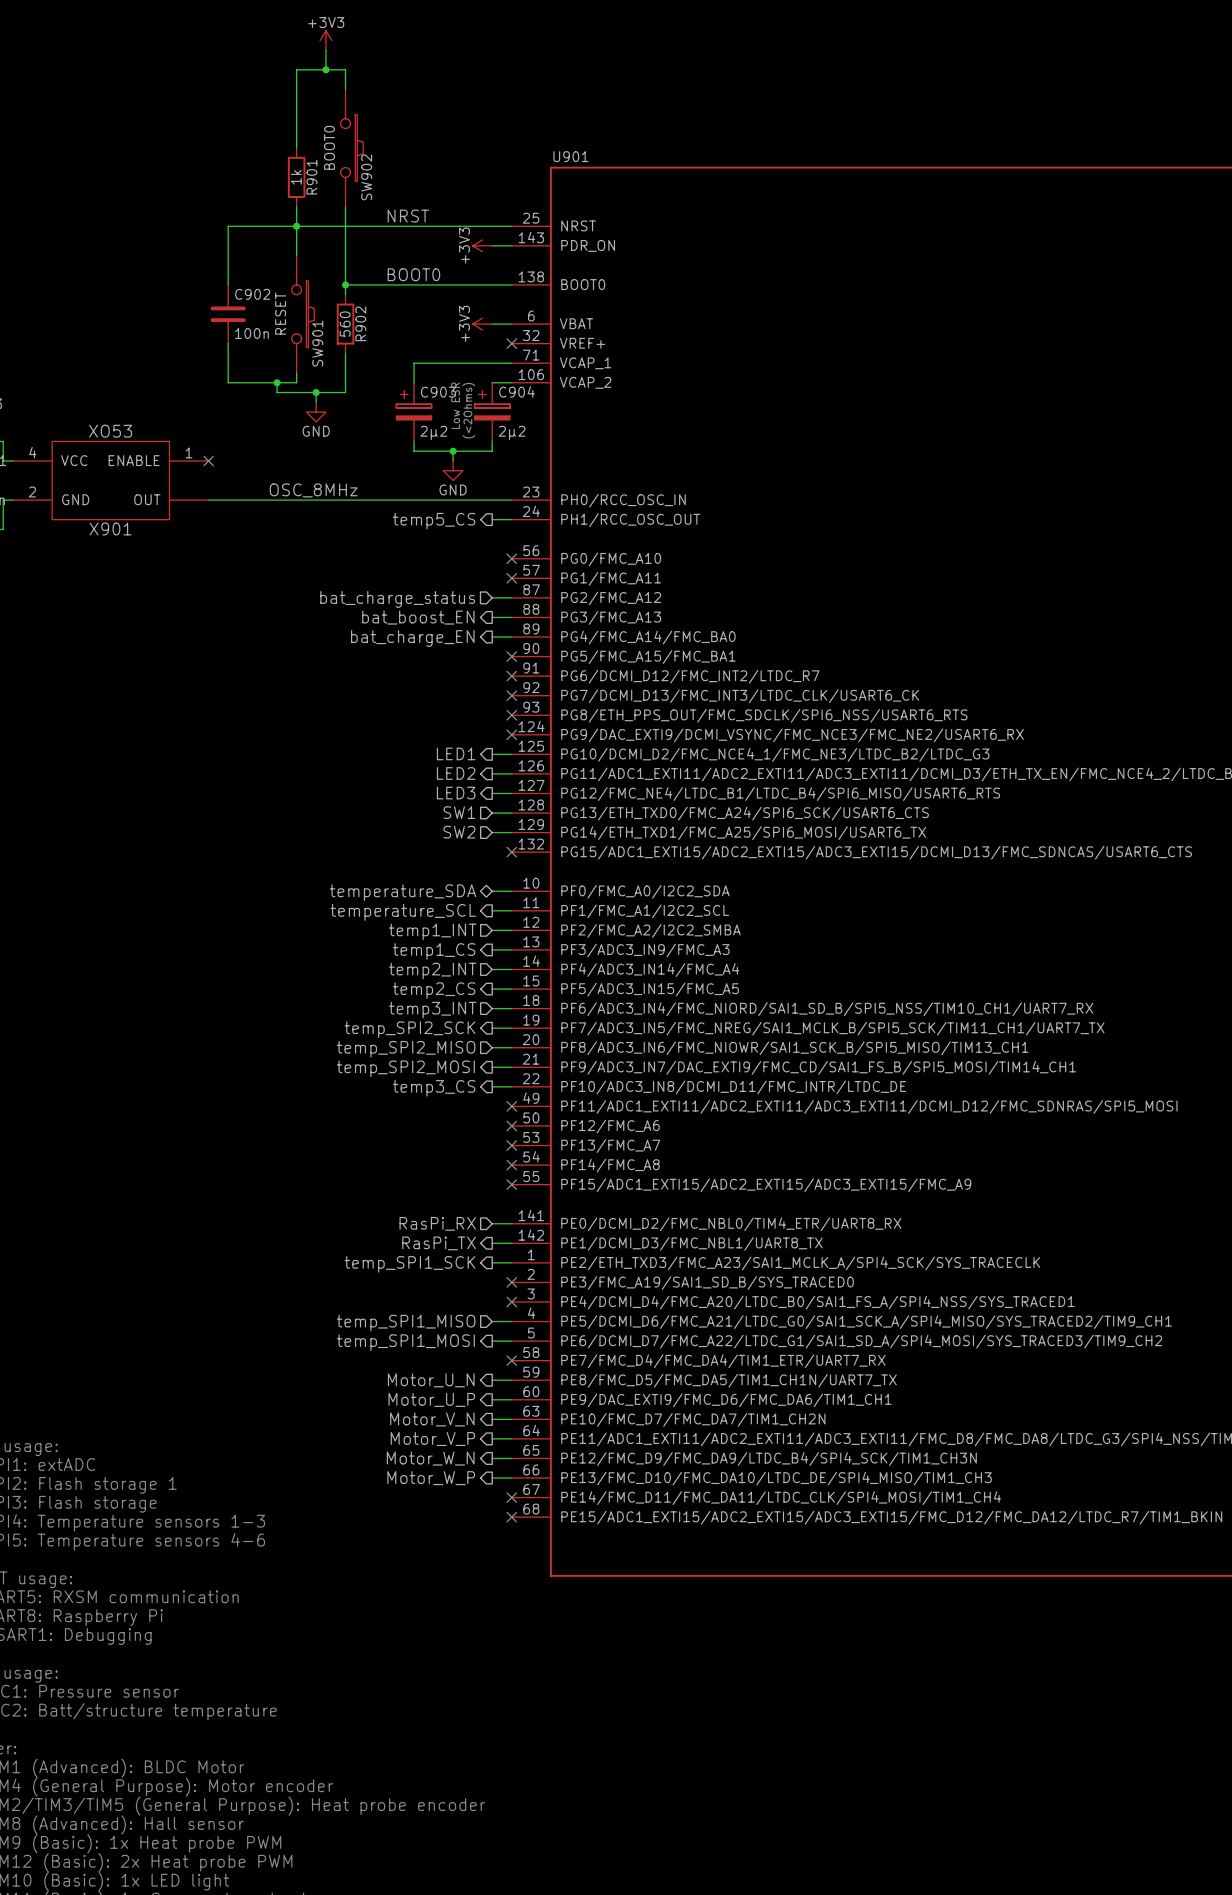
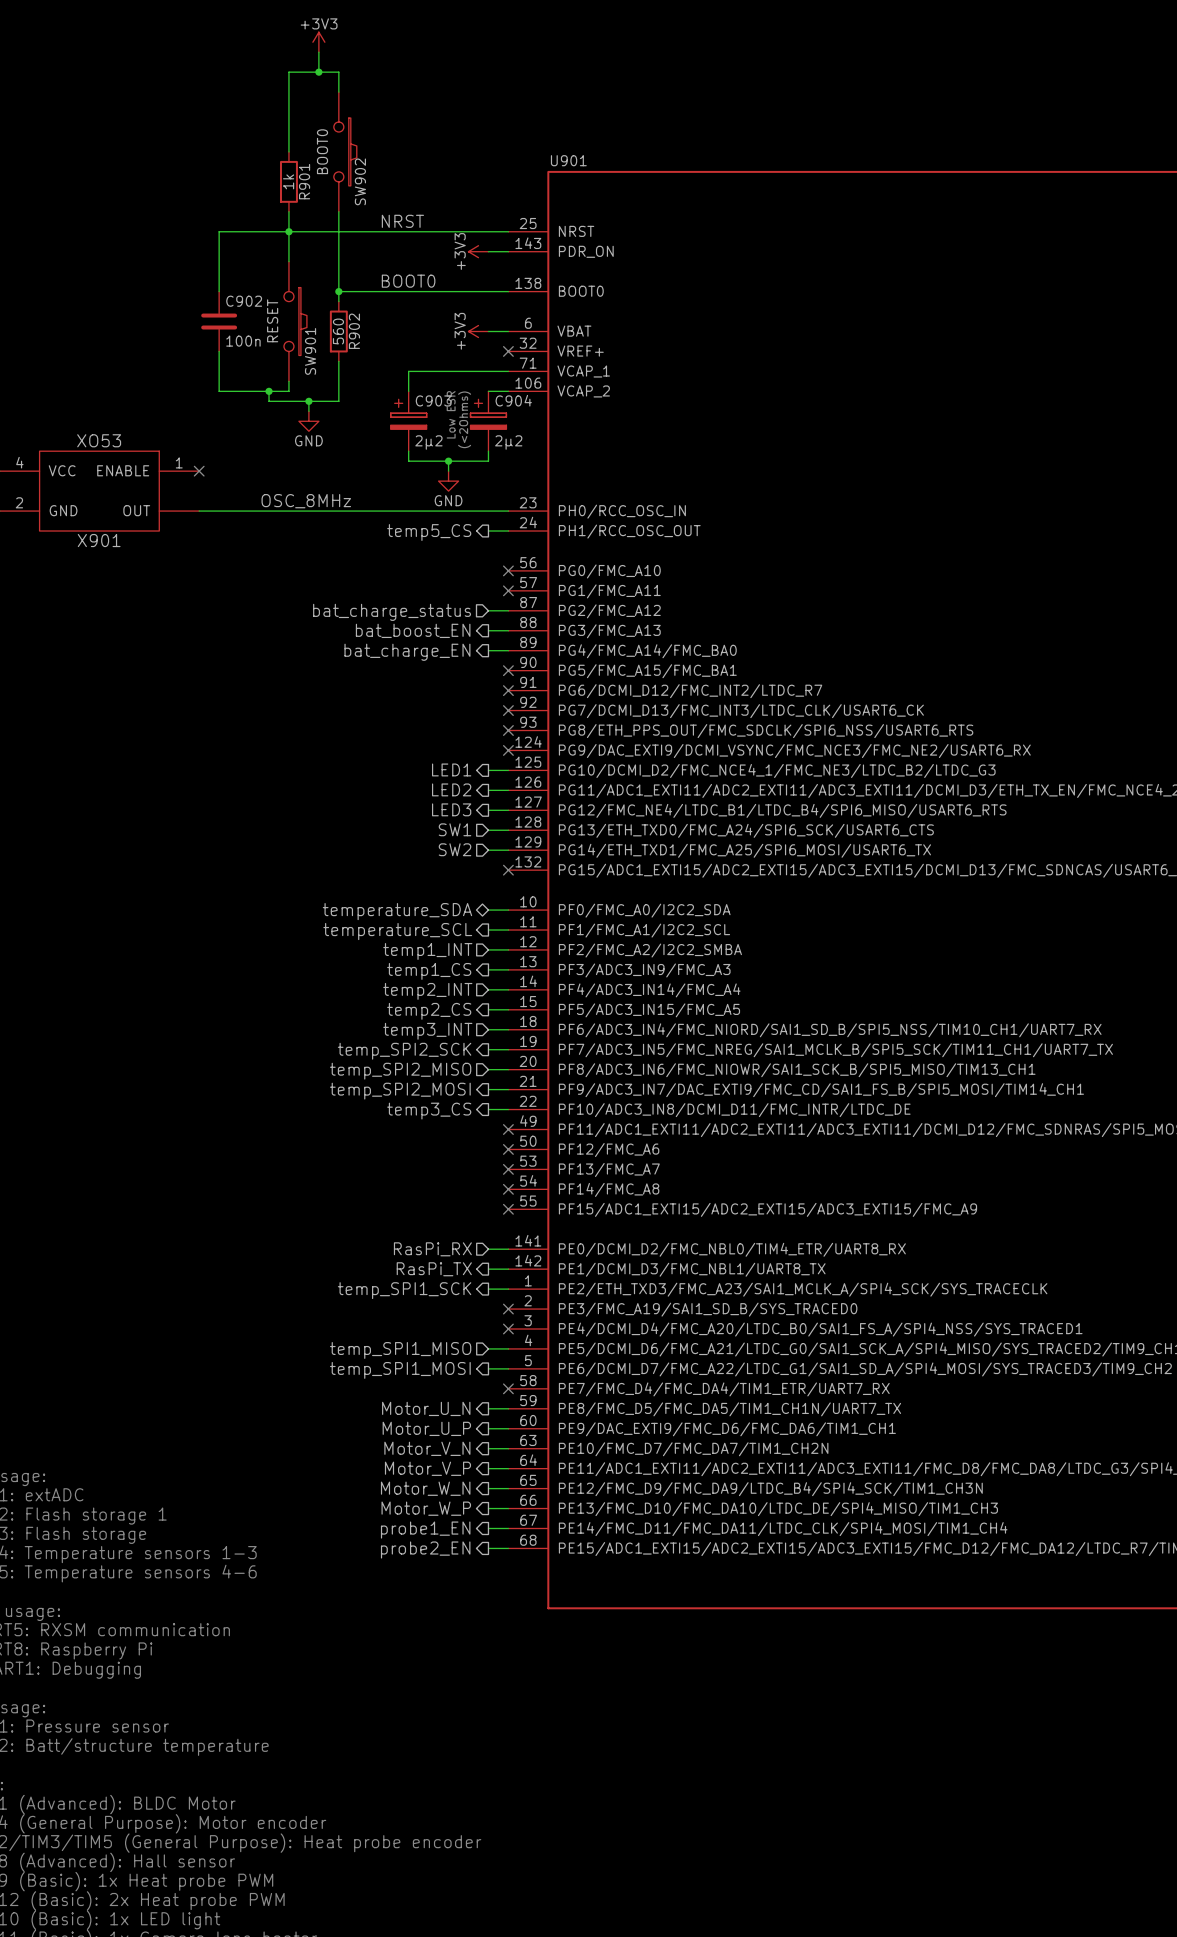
wire: none -> (488, 1528) (508, 1528)
no-connect mark: (511, 1497) -> none
hierarchical label: none -> probe1_EN (425, 1530)
wire: none -> (488, 1548) (508, 1548)
no-connect mark: (511, 1517) -> none
hierarchical label: none -> probe2_EN (425, 1550)

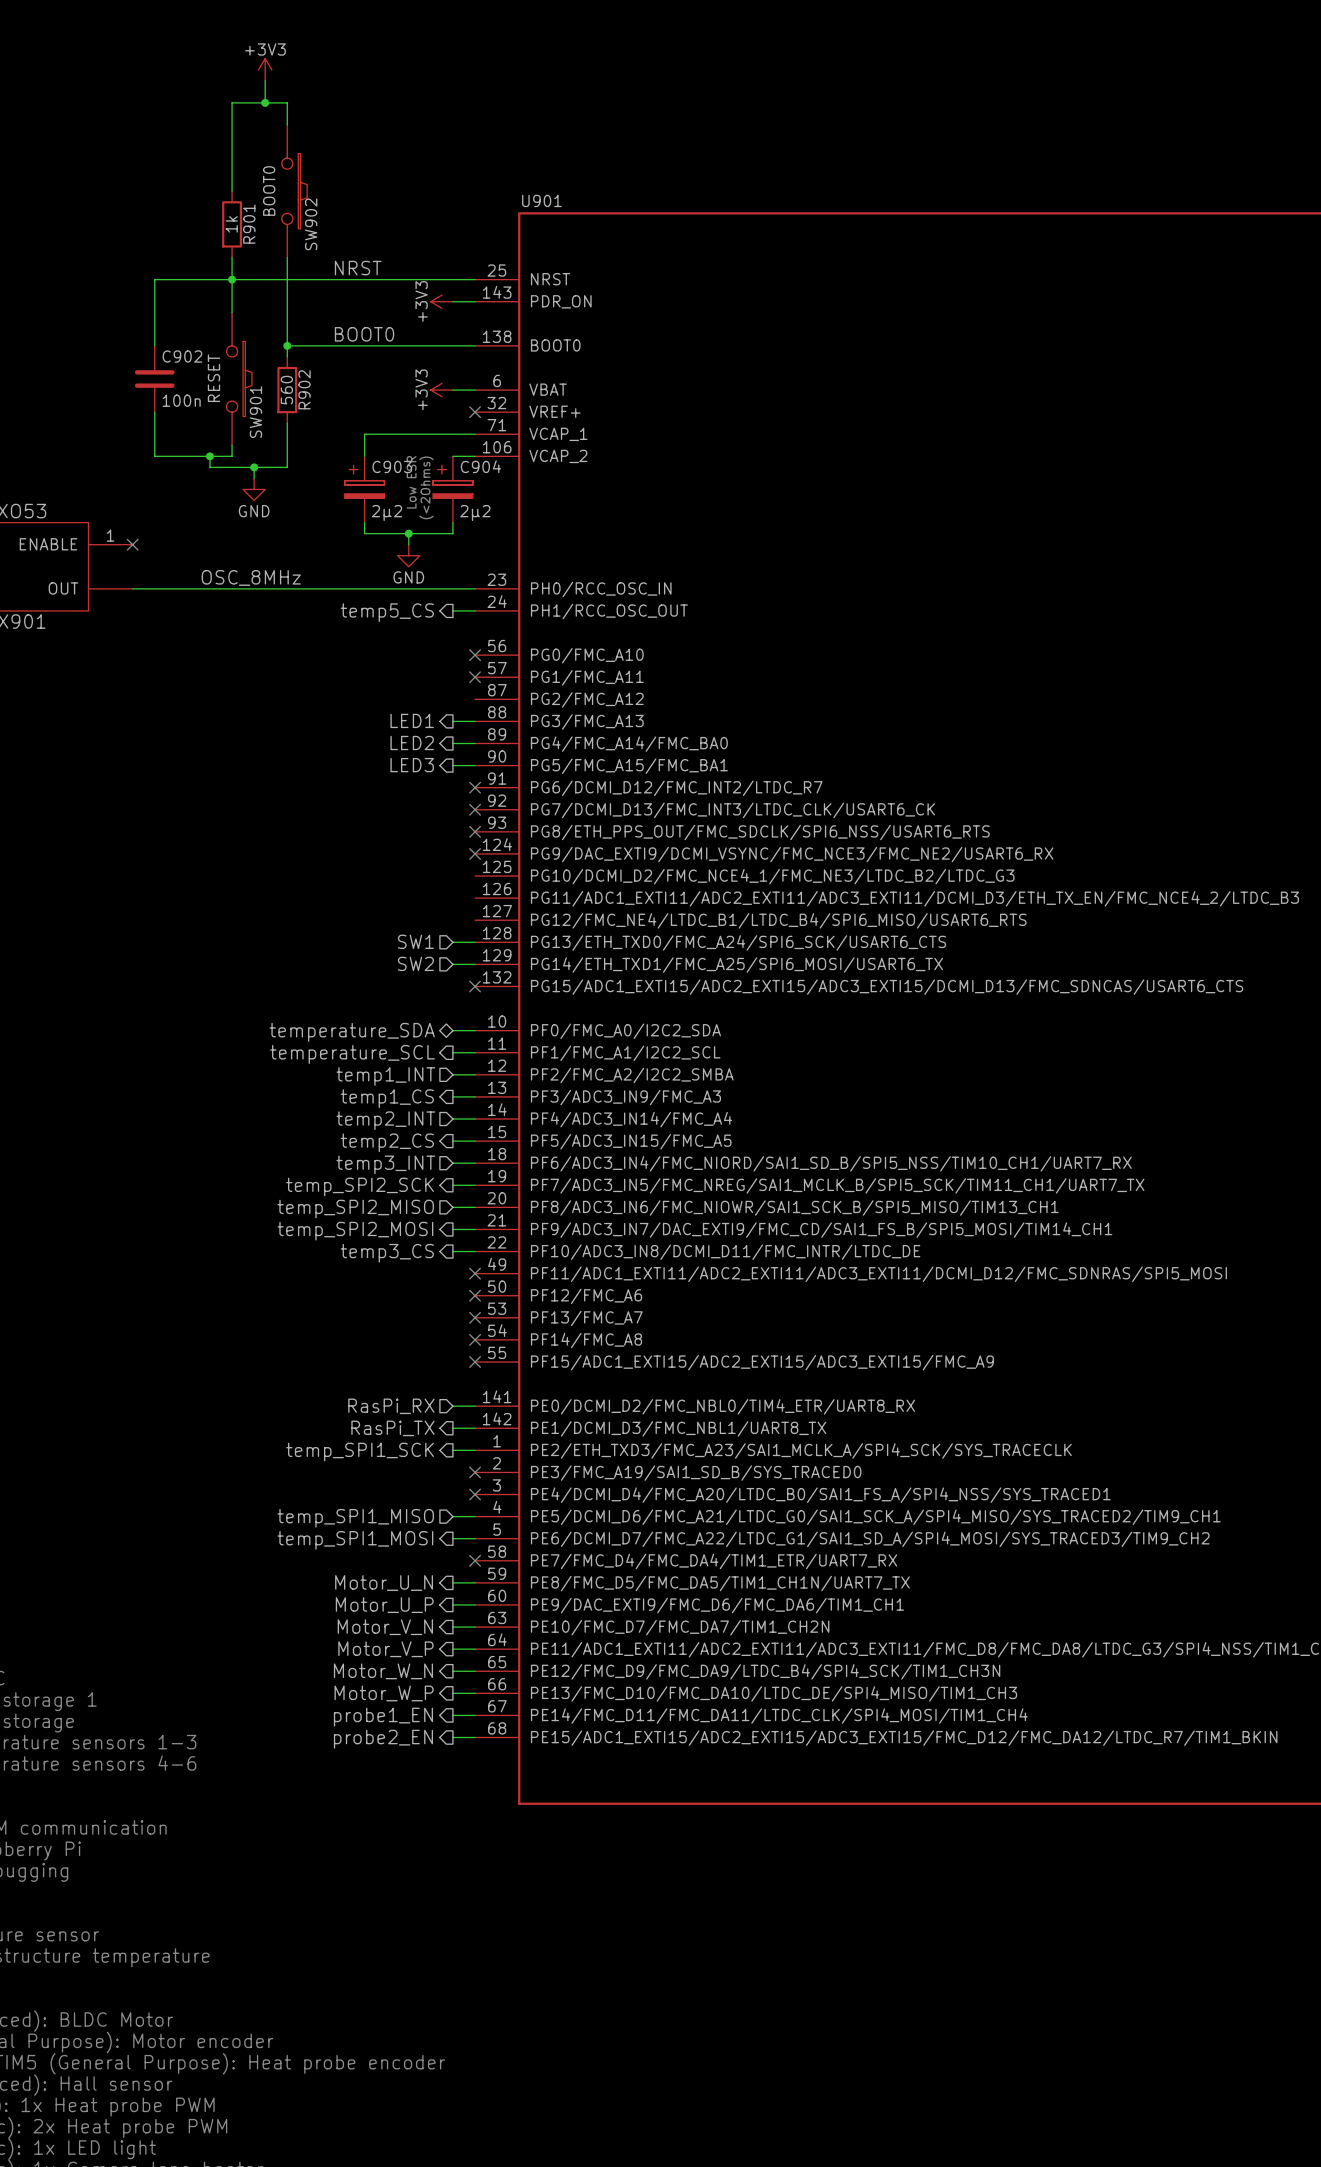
wire: (488, 610) (508, 610) -> (452, 765) (475, 765)
hierarchical label: bat_charge_status (392, 612) -> none
hierarchical label: bat_boost_EN (413, 630) -> LED1 (412, 720)
hierarchical label: bat_charge_EN (407, 652) -> LED2 (412, 743)
no-connect mark: (508, 670) -> none
hierarchical label: LED1 (451, 769) -> none
wire: (488, 770) (508, 770) -> none
hierarchical label: LED2 (451, 789) -> none
wire: (488, 790) (508, 790) -> none
hierarchical label position: LED3 (451, 809) -> LED3 (412, 765)
wire: (488, 810) (508, 810) -> none

